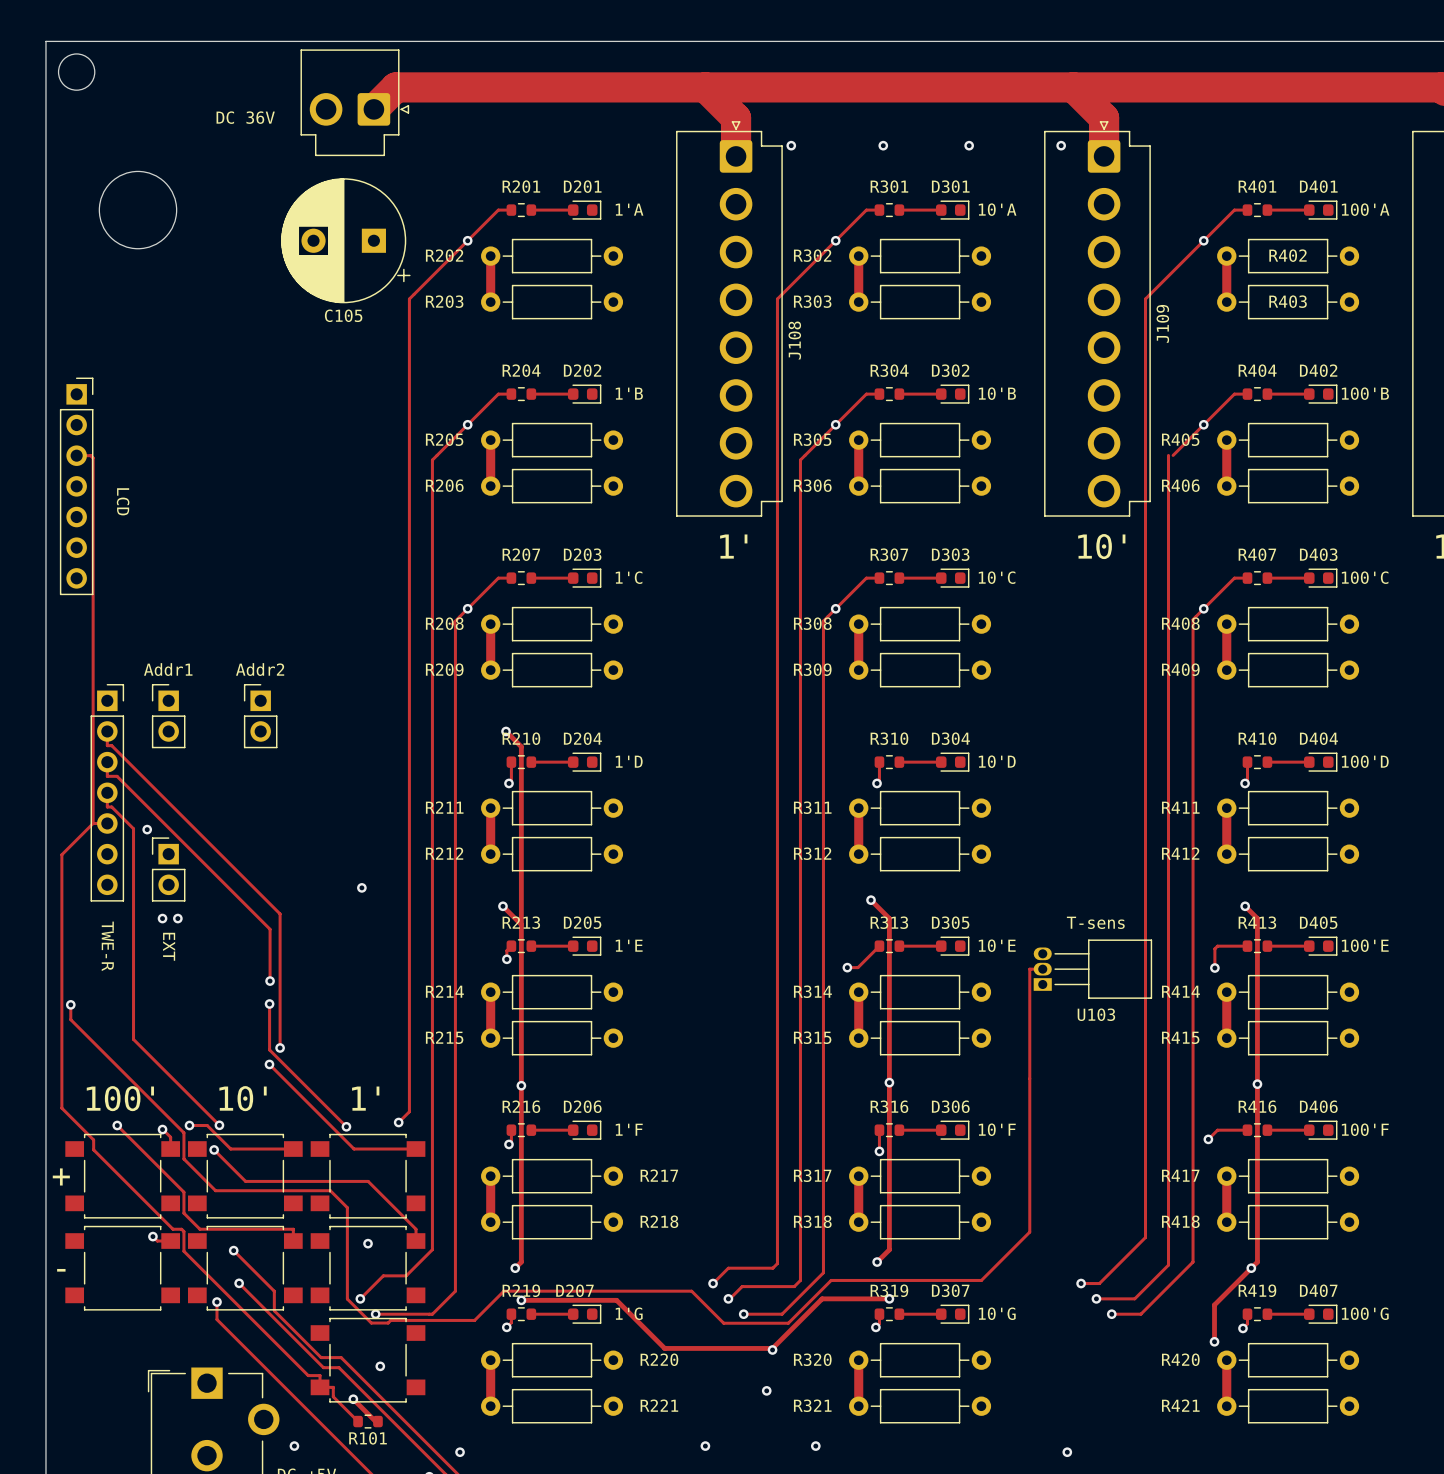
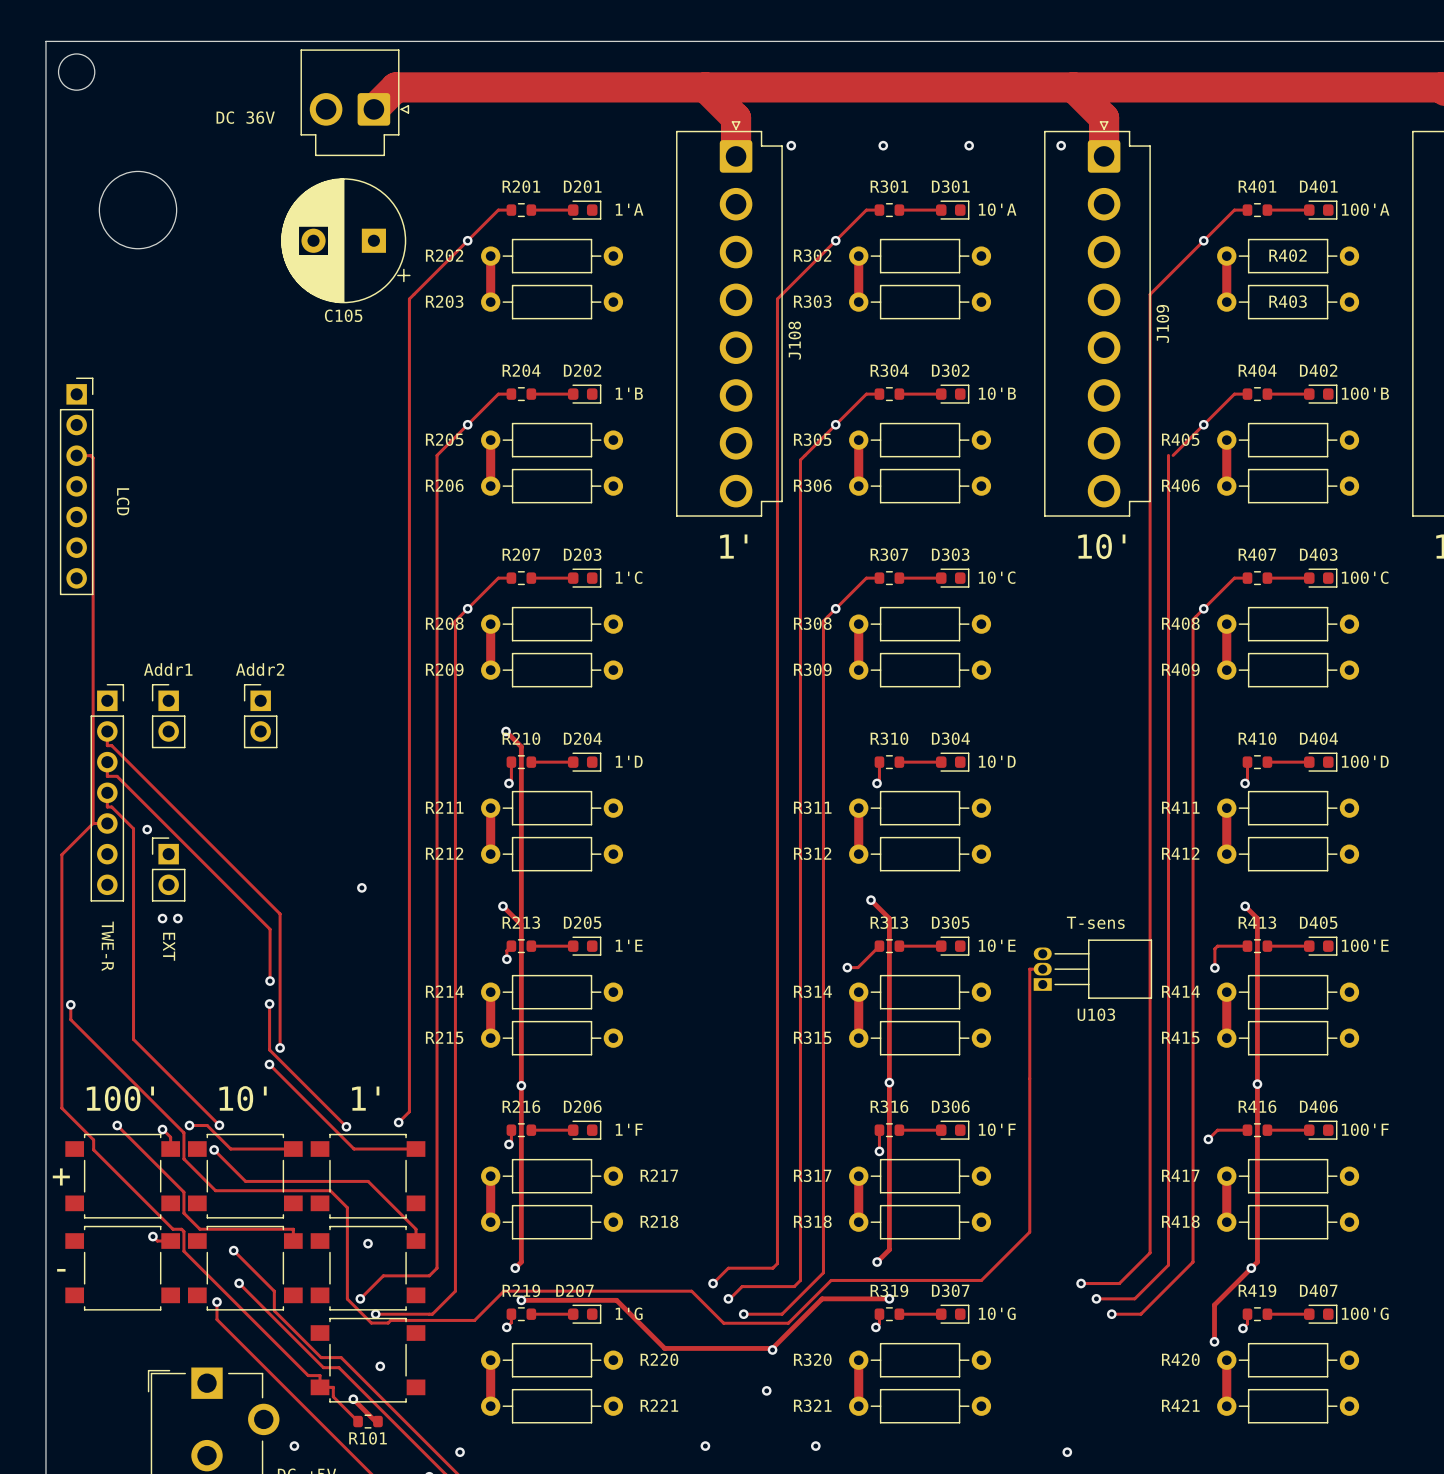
track: (1150, 294) (1145, 299) (1145, 1237) (1099, 1283) -> (1150, 294) (1150, 1252) (1119, 1283) (1099, 1283)
track: (437, 455) (432, 460) (432, 1249) (406, 1275) -> (437, 455) (437, 1268) (429, 1275) (406, 1275)

